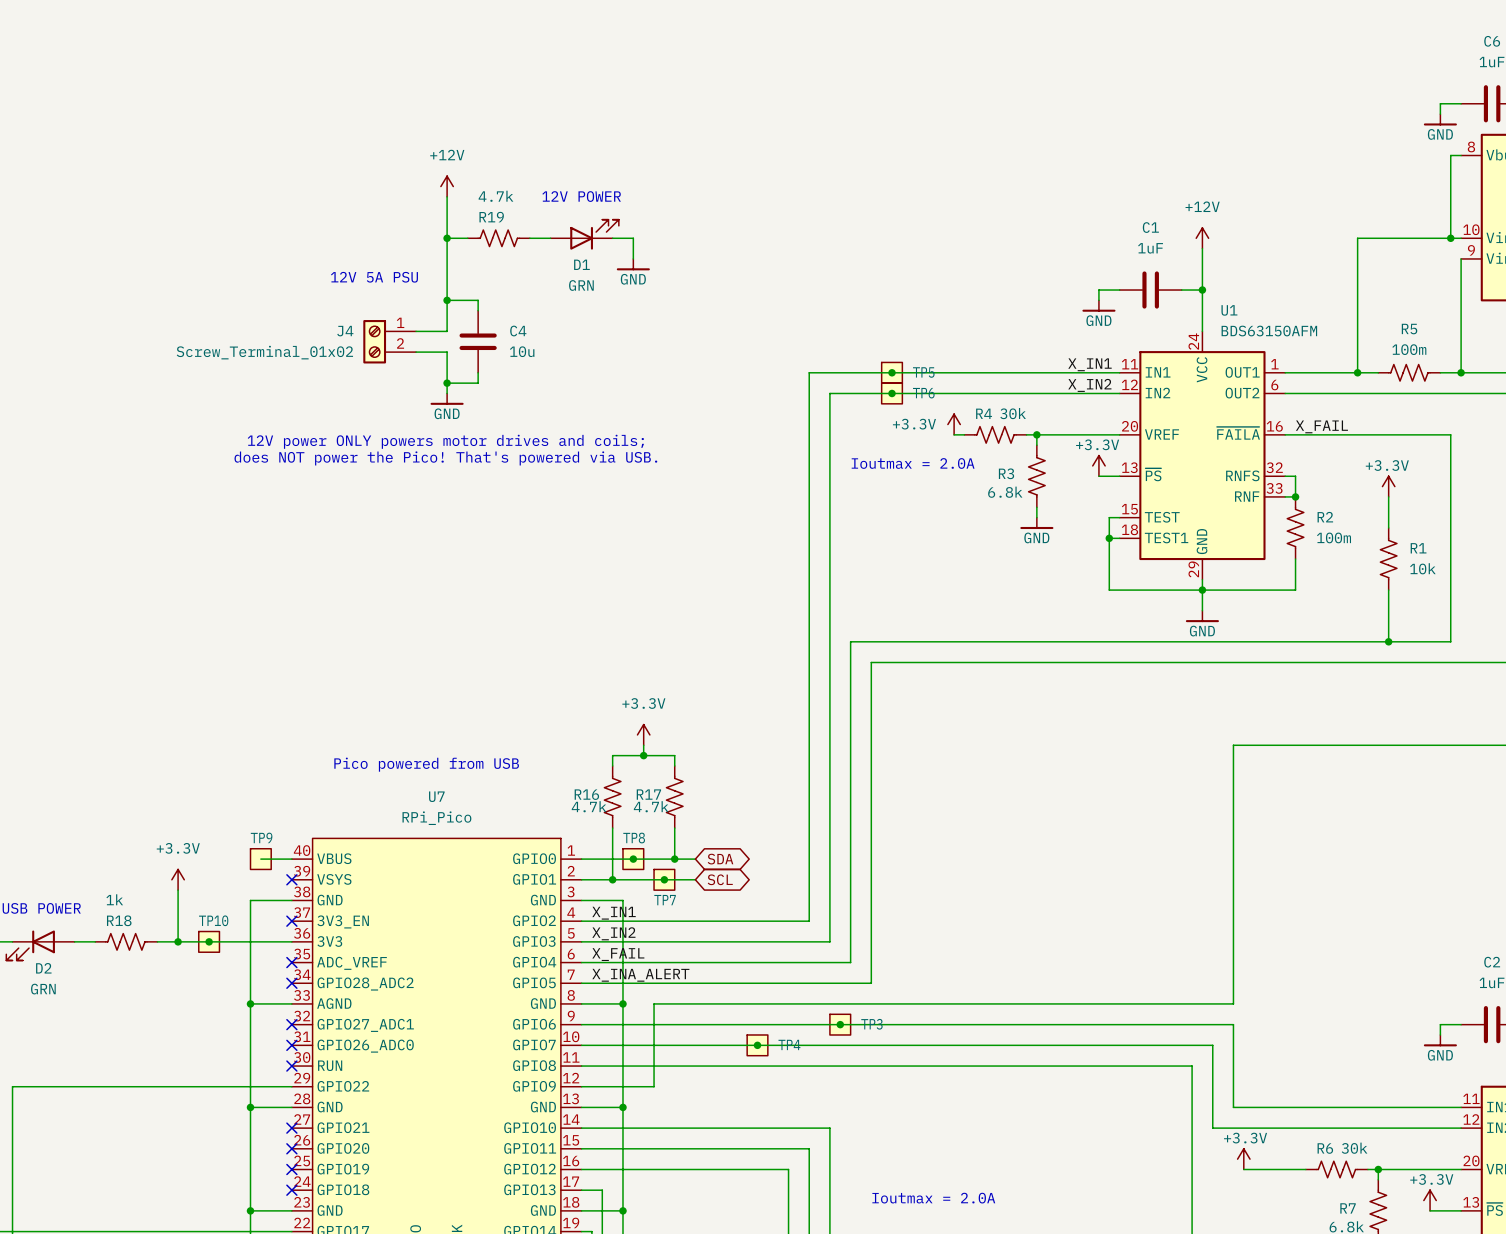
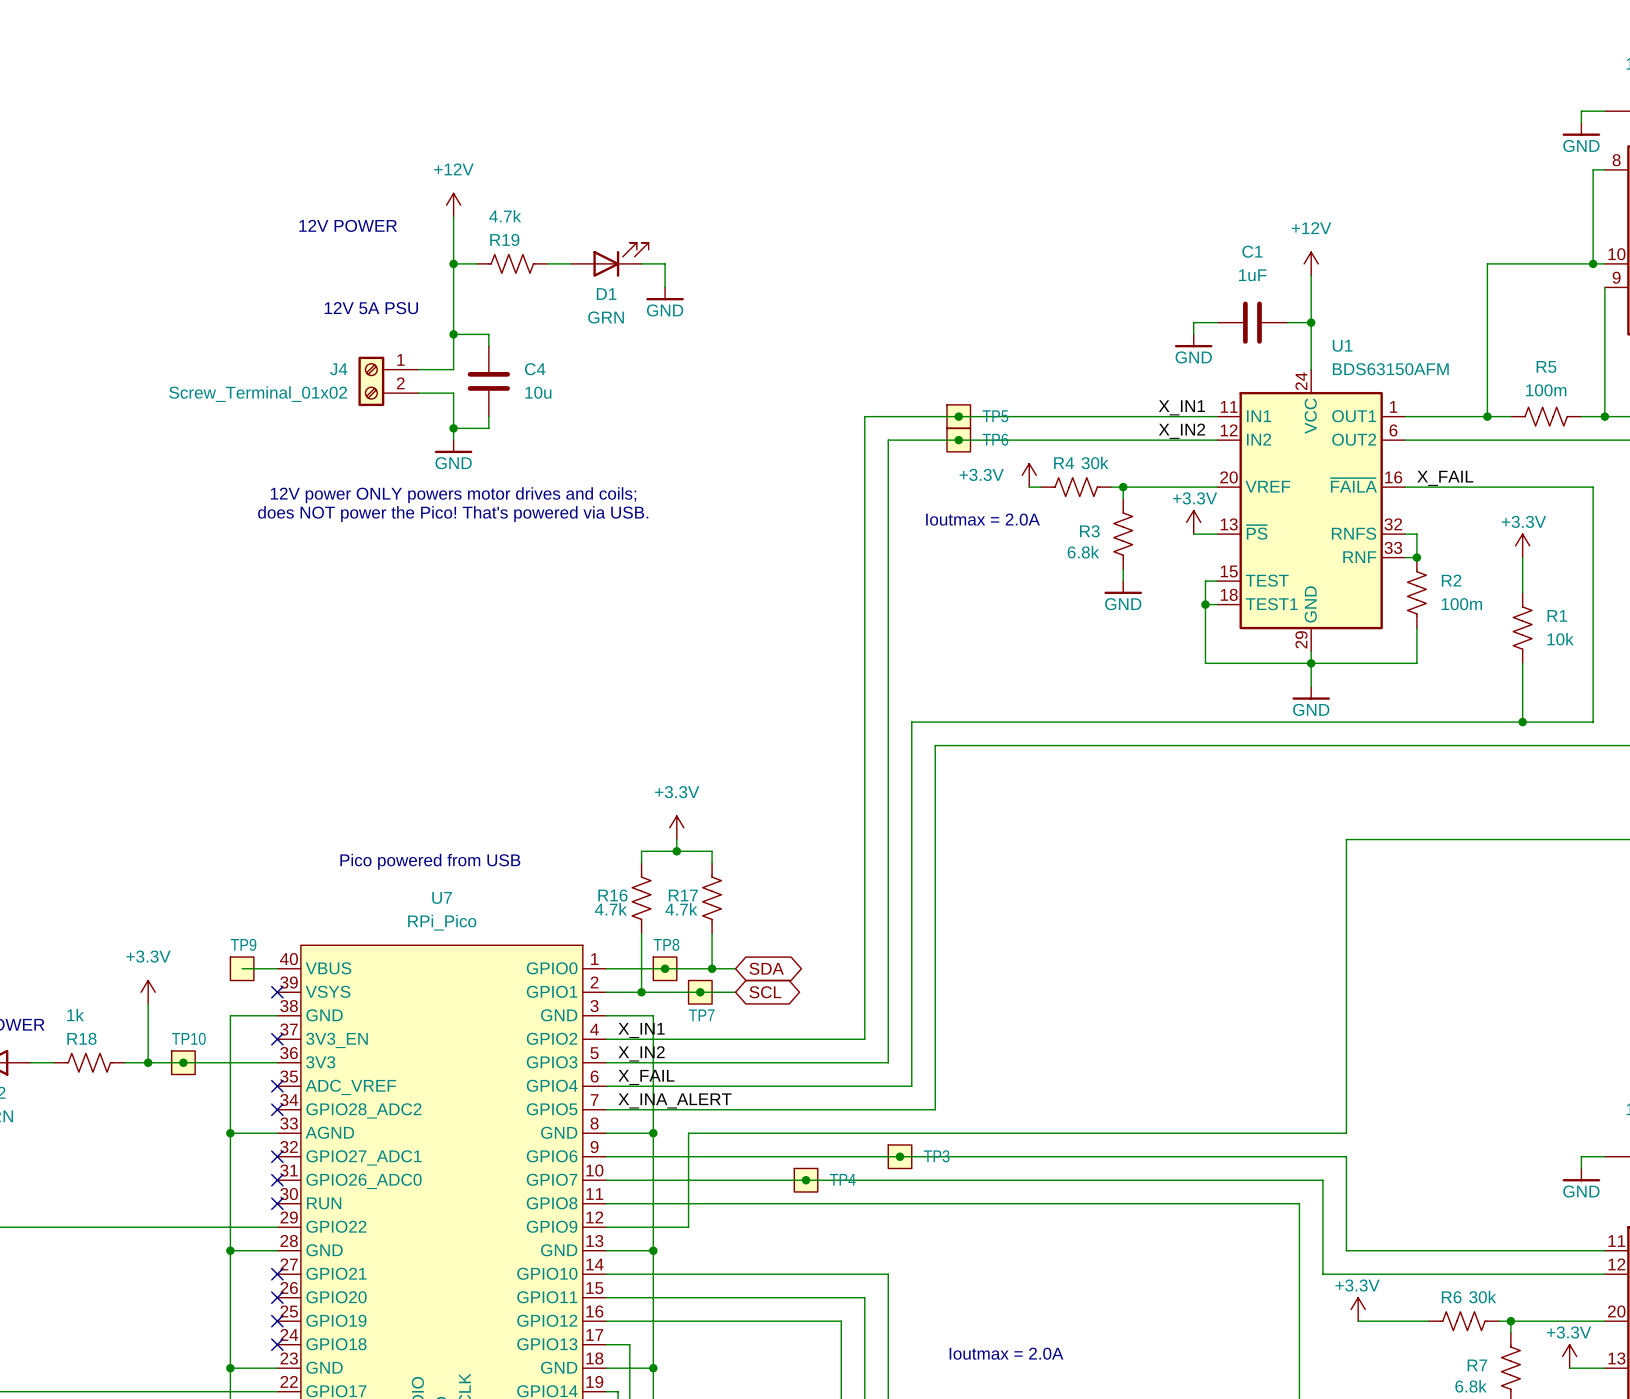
text: 12V POWER (581, 196) -> none
text: none -> 12V POWER (348, 225)

